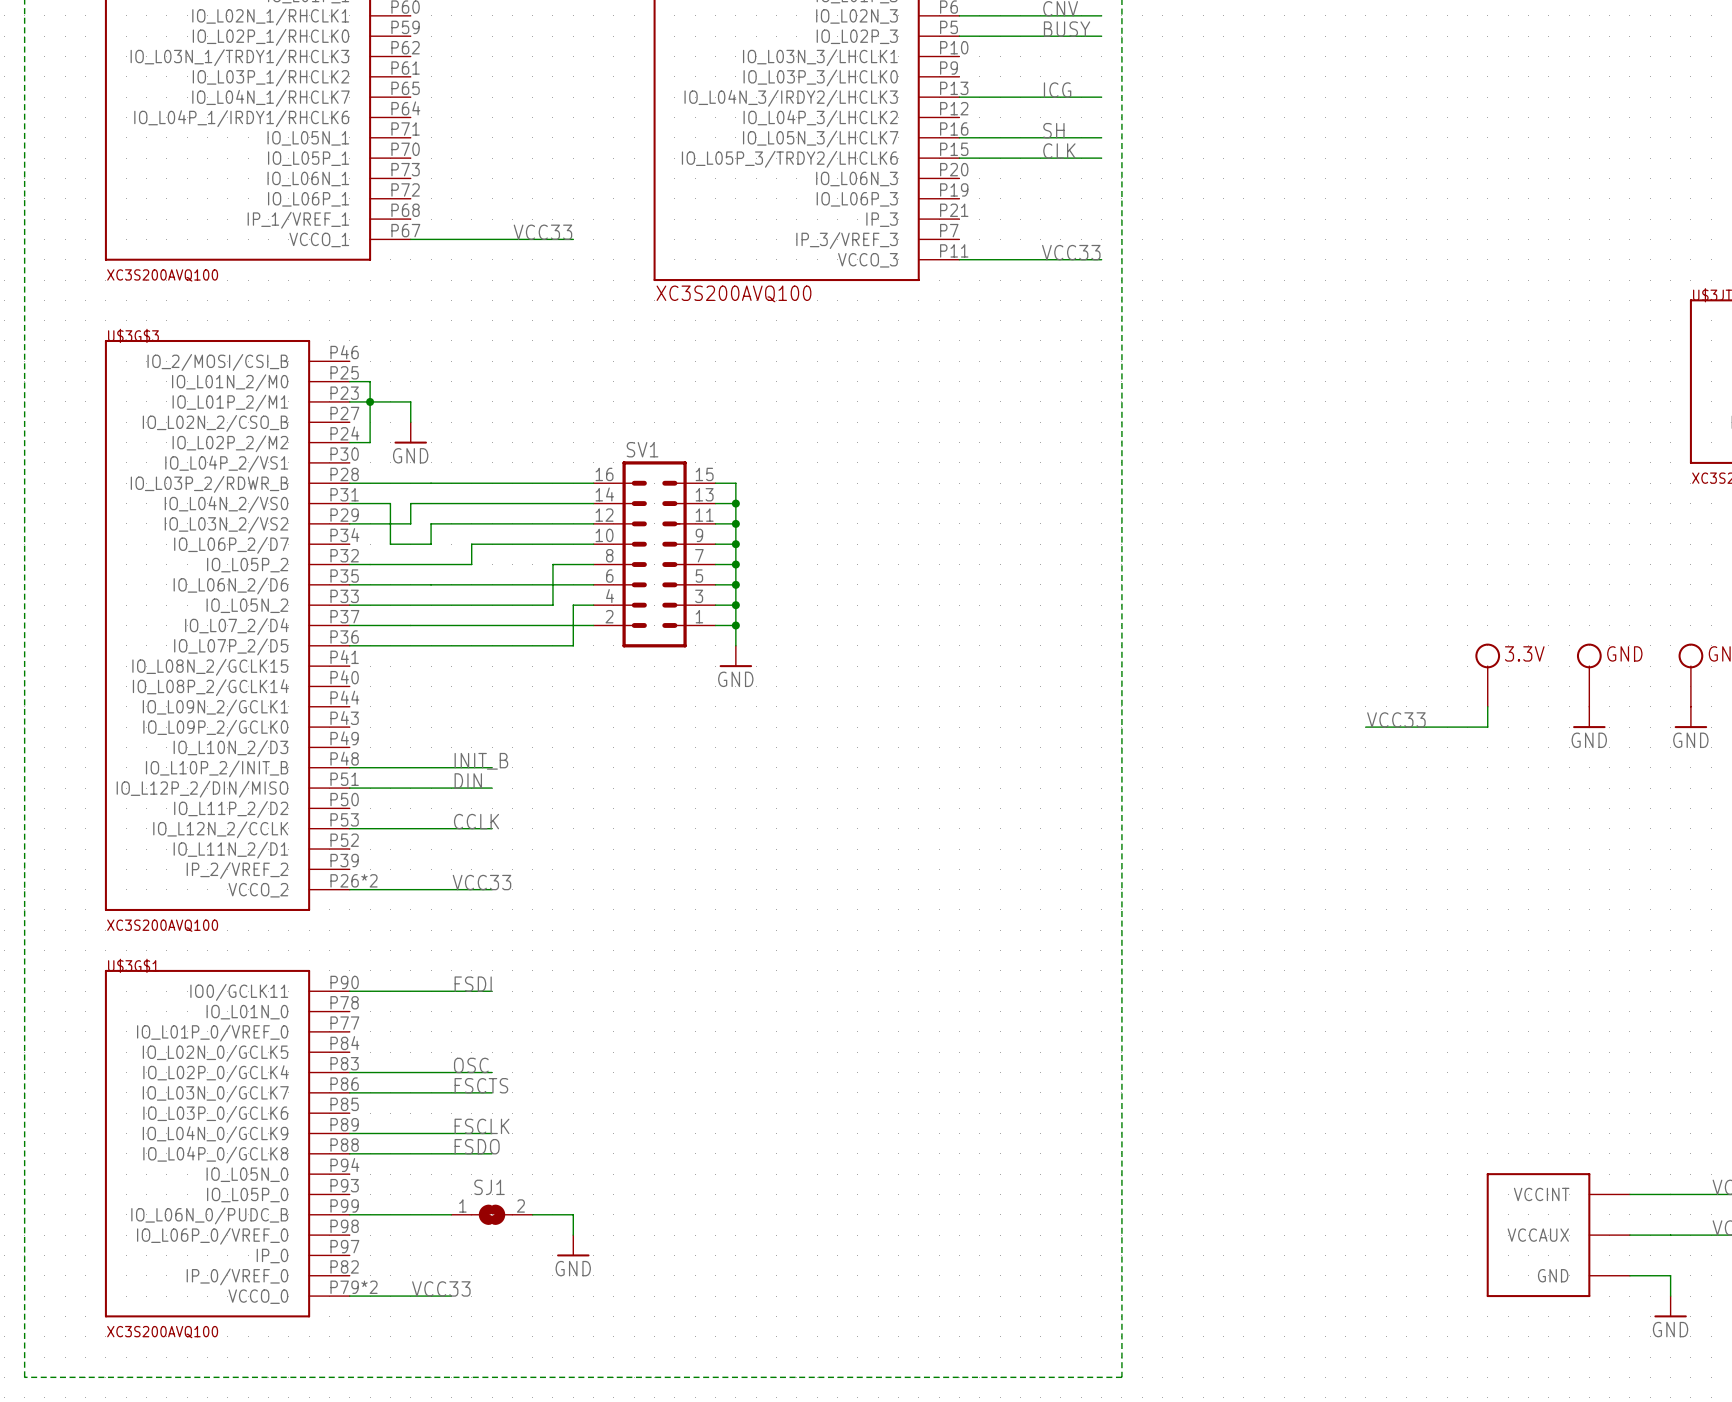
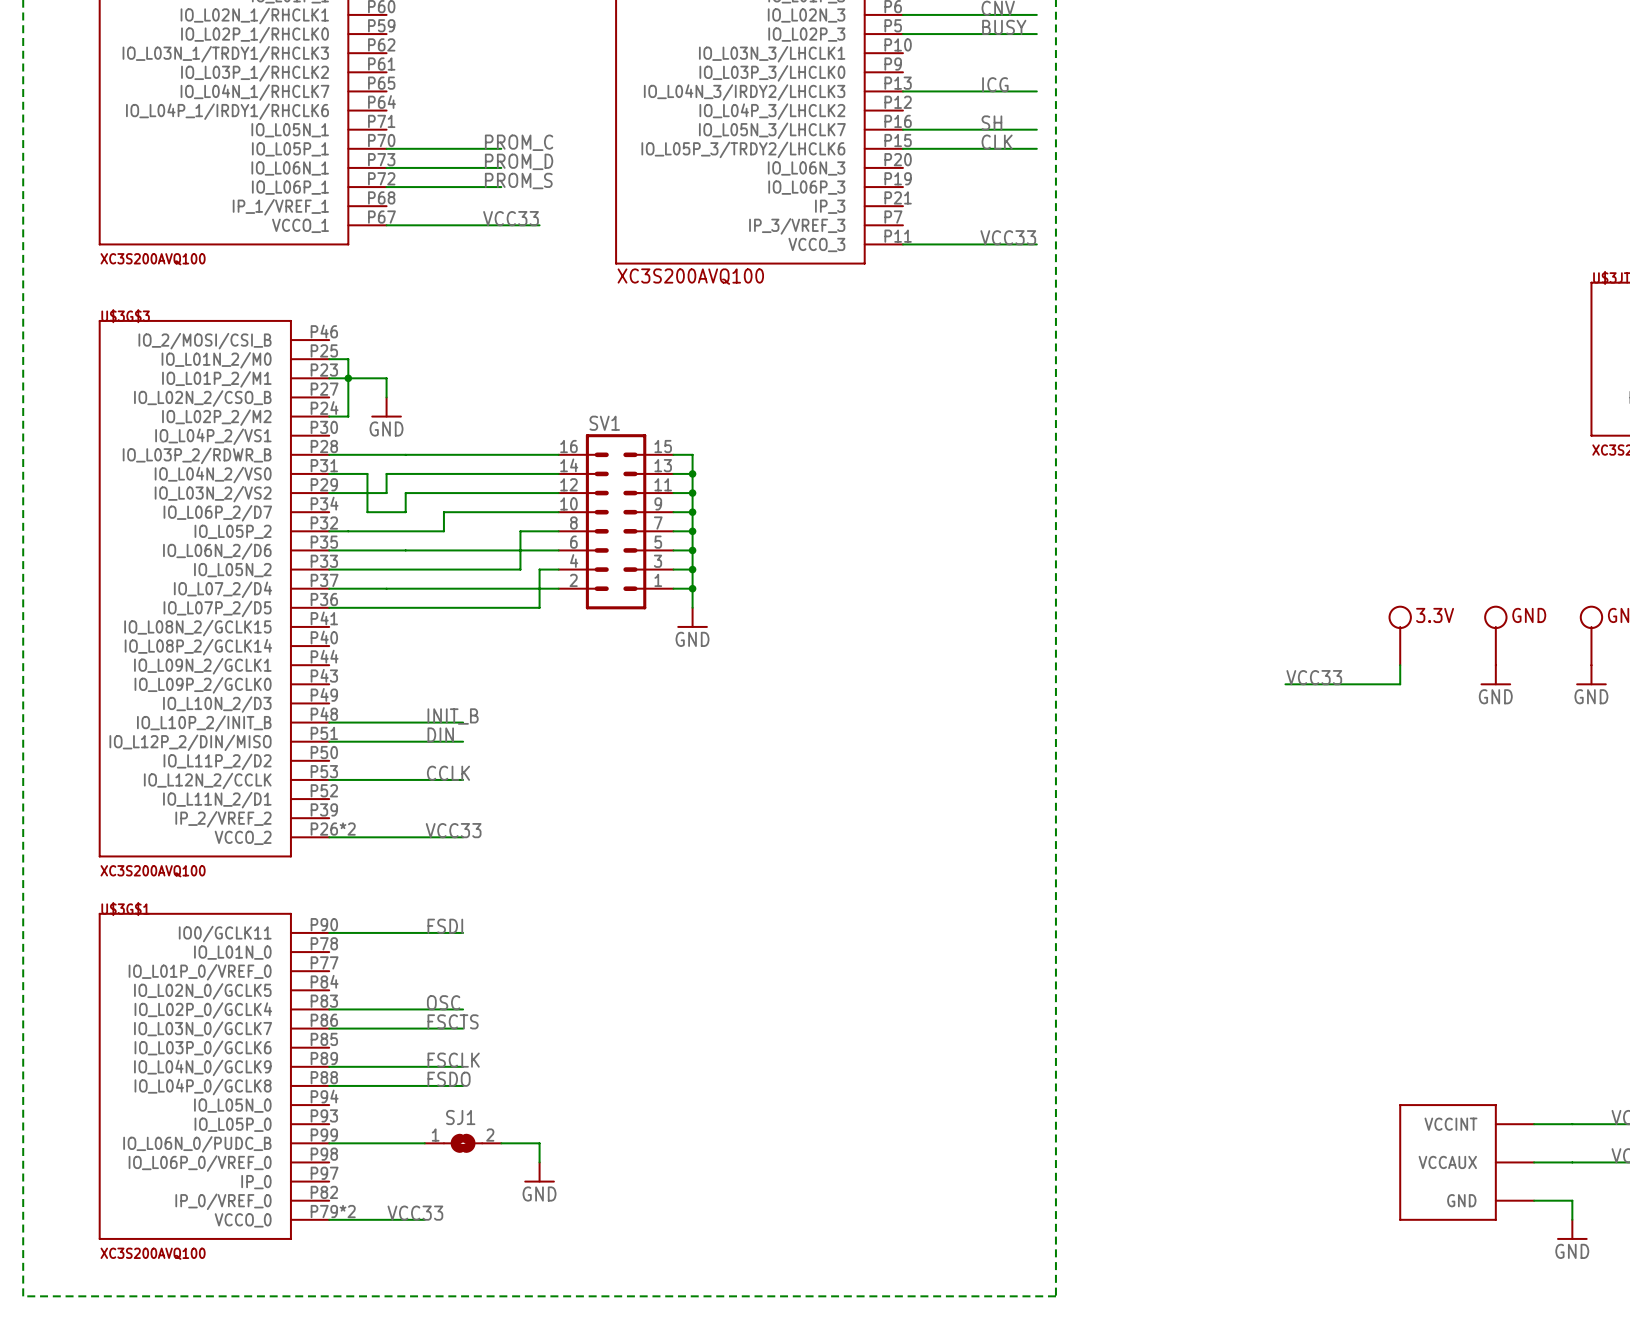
label: none -> PROM_C (519, 142)
wire: none -> (386, 148) (501, 148)
label: none -> PROM_D (519, 161)
wire: none -> (386, 167) (501, 167)
label: none -> PROM_S (518, 181)
wire: none -> (386, 187) (501, 187)

